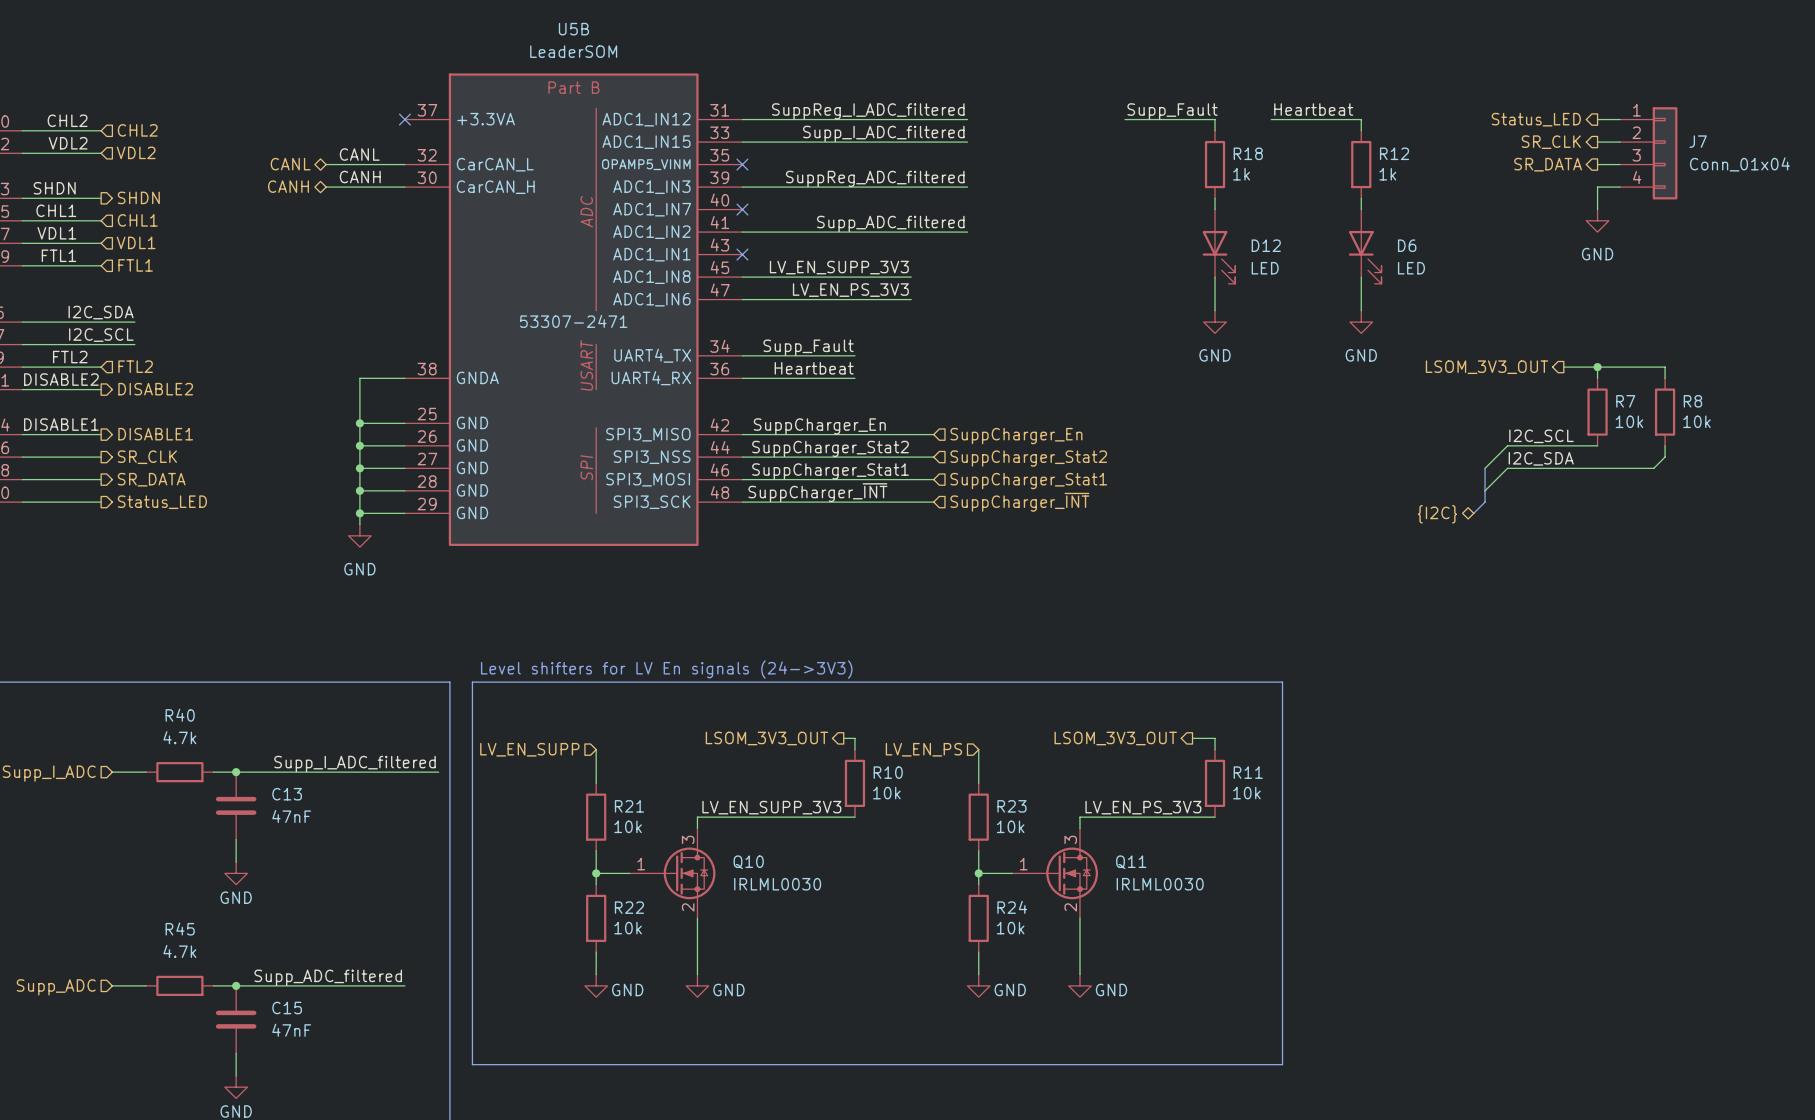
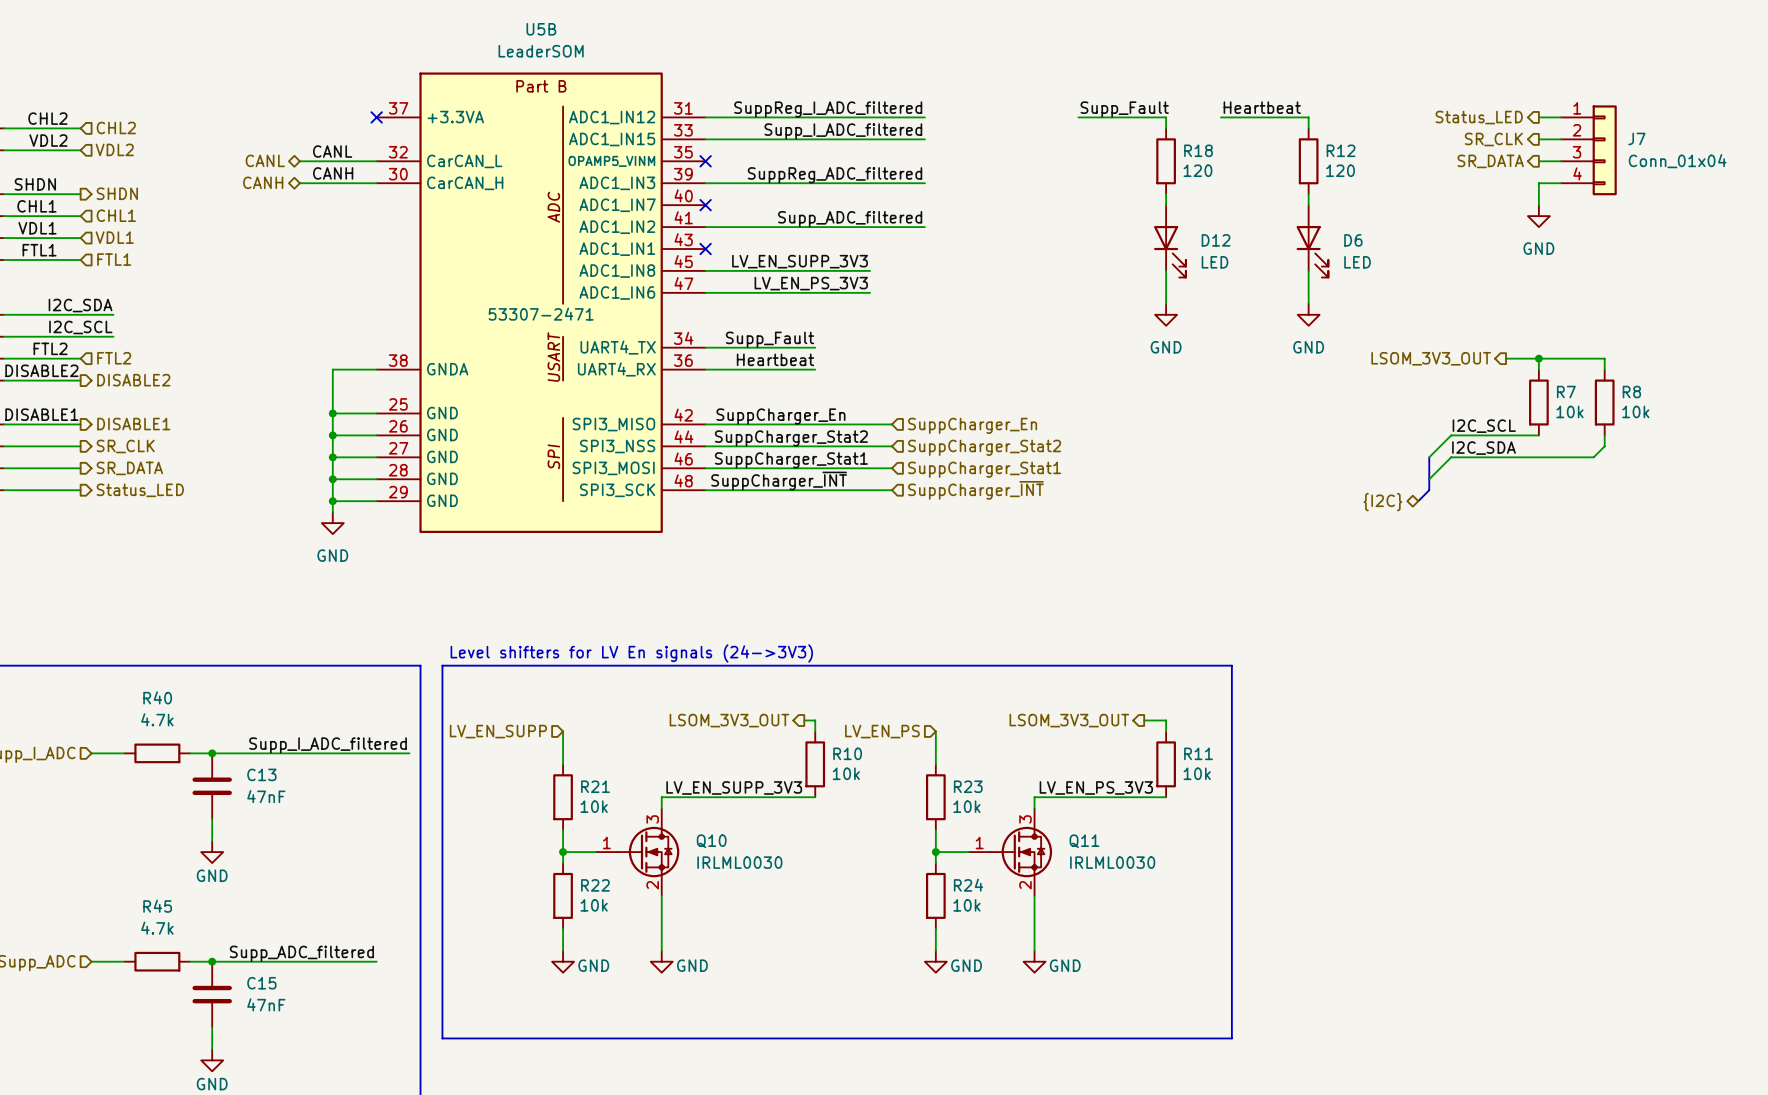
R18 value: 1k (1241, 174) -> 120 (1197, 170)
R12 value: 1k (1387, 174) -> 120 (1340, 170)

